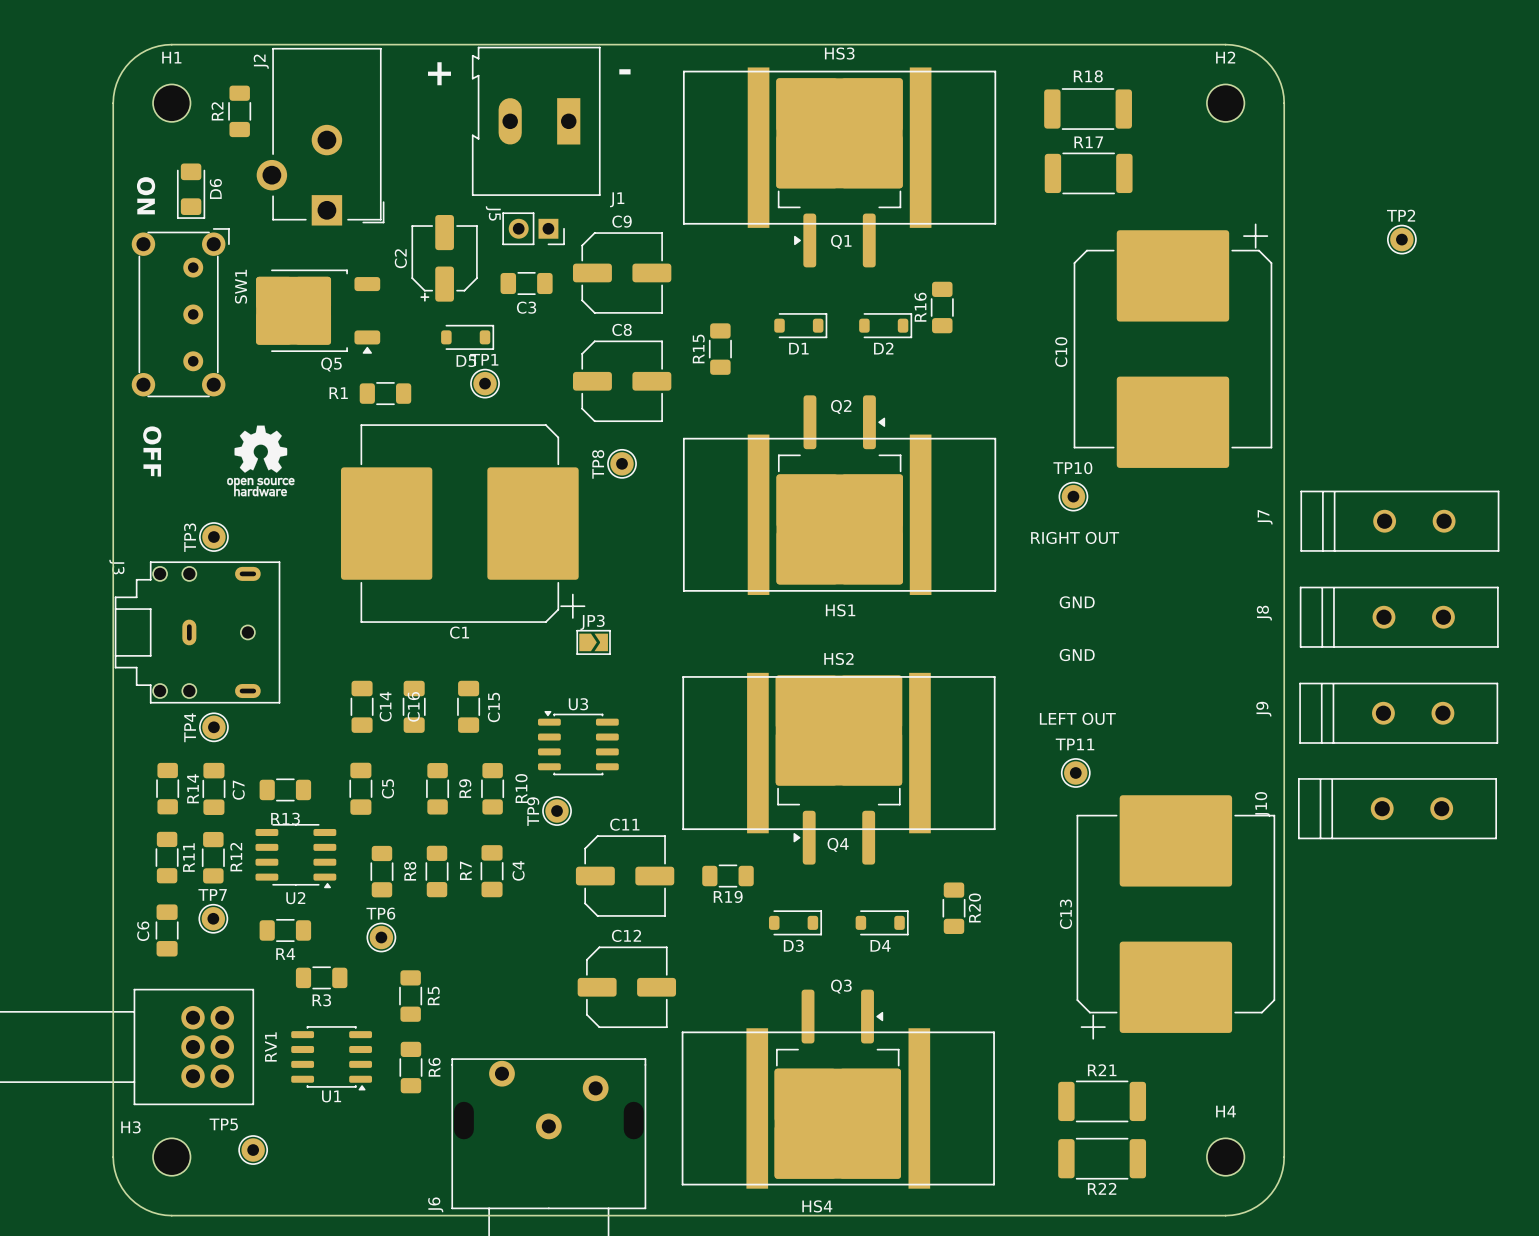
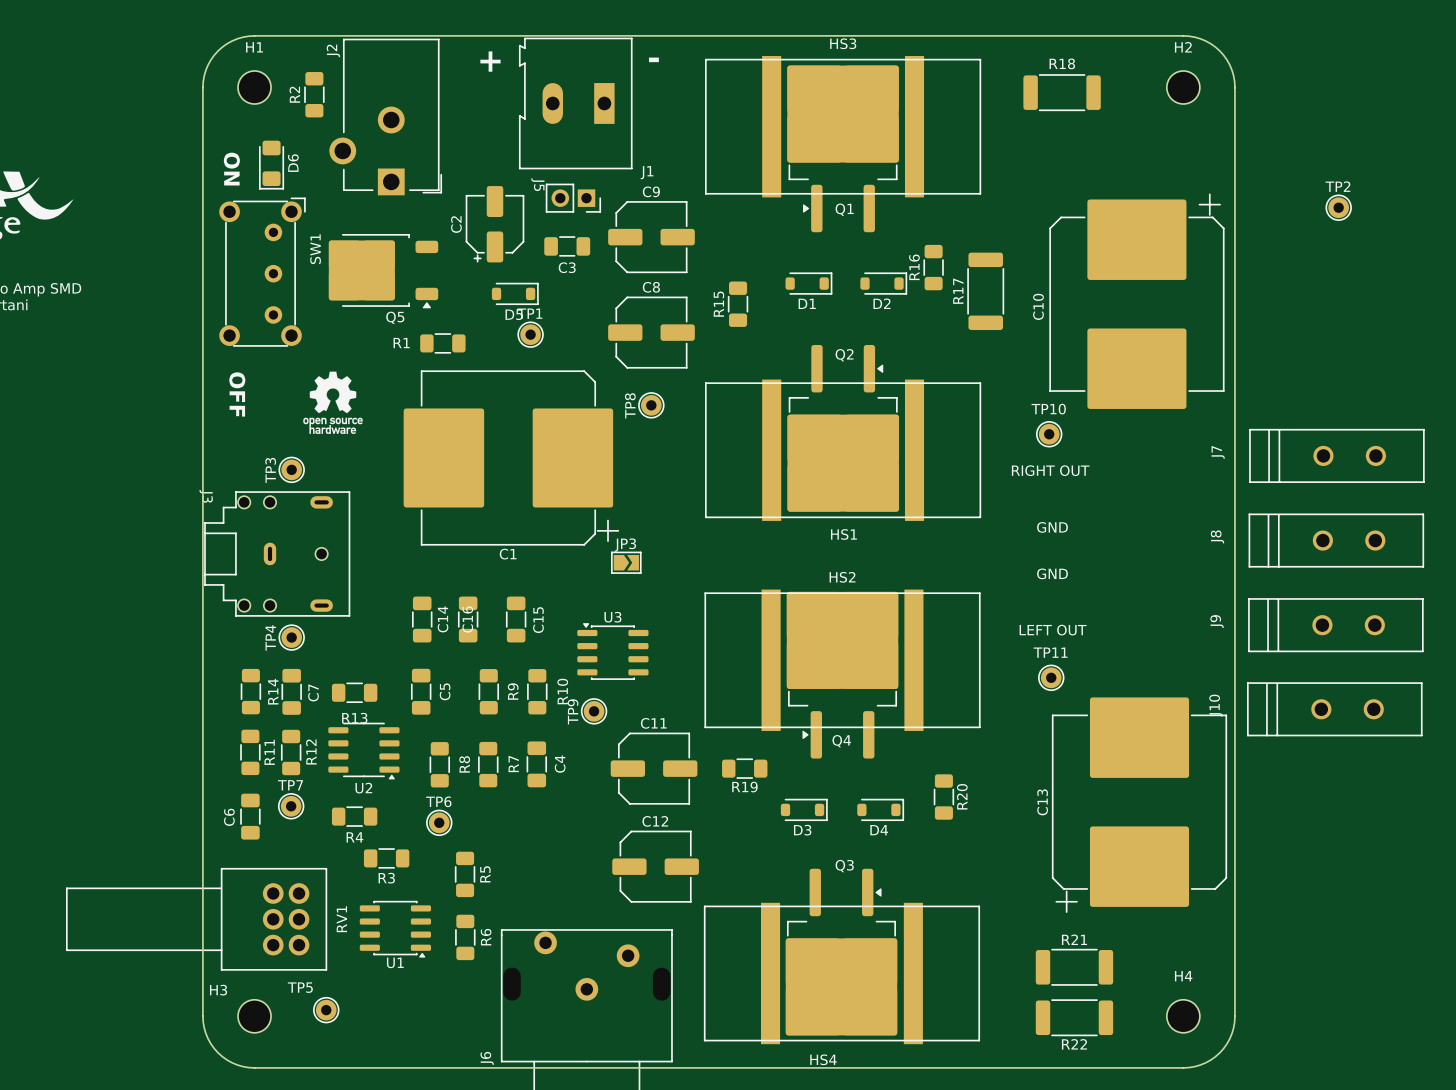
R17 name position: R17 (1088, 142) -> R17 (958, 291)
R17 rotation: 0° (1088, 173) -> 90° clockwise (985, 291)
R17 position: (1088, 173) -> (985, 291)

